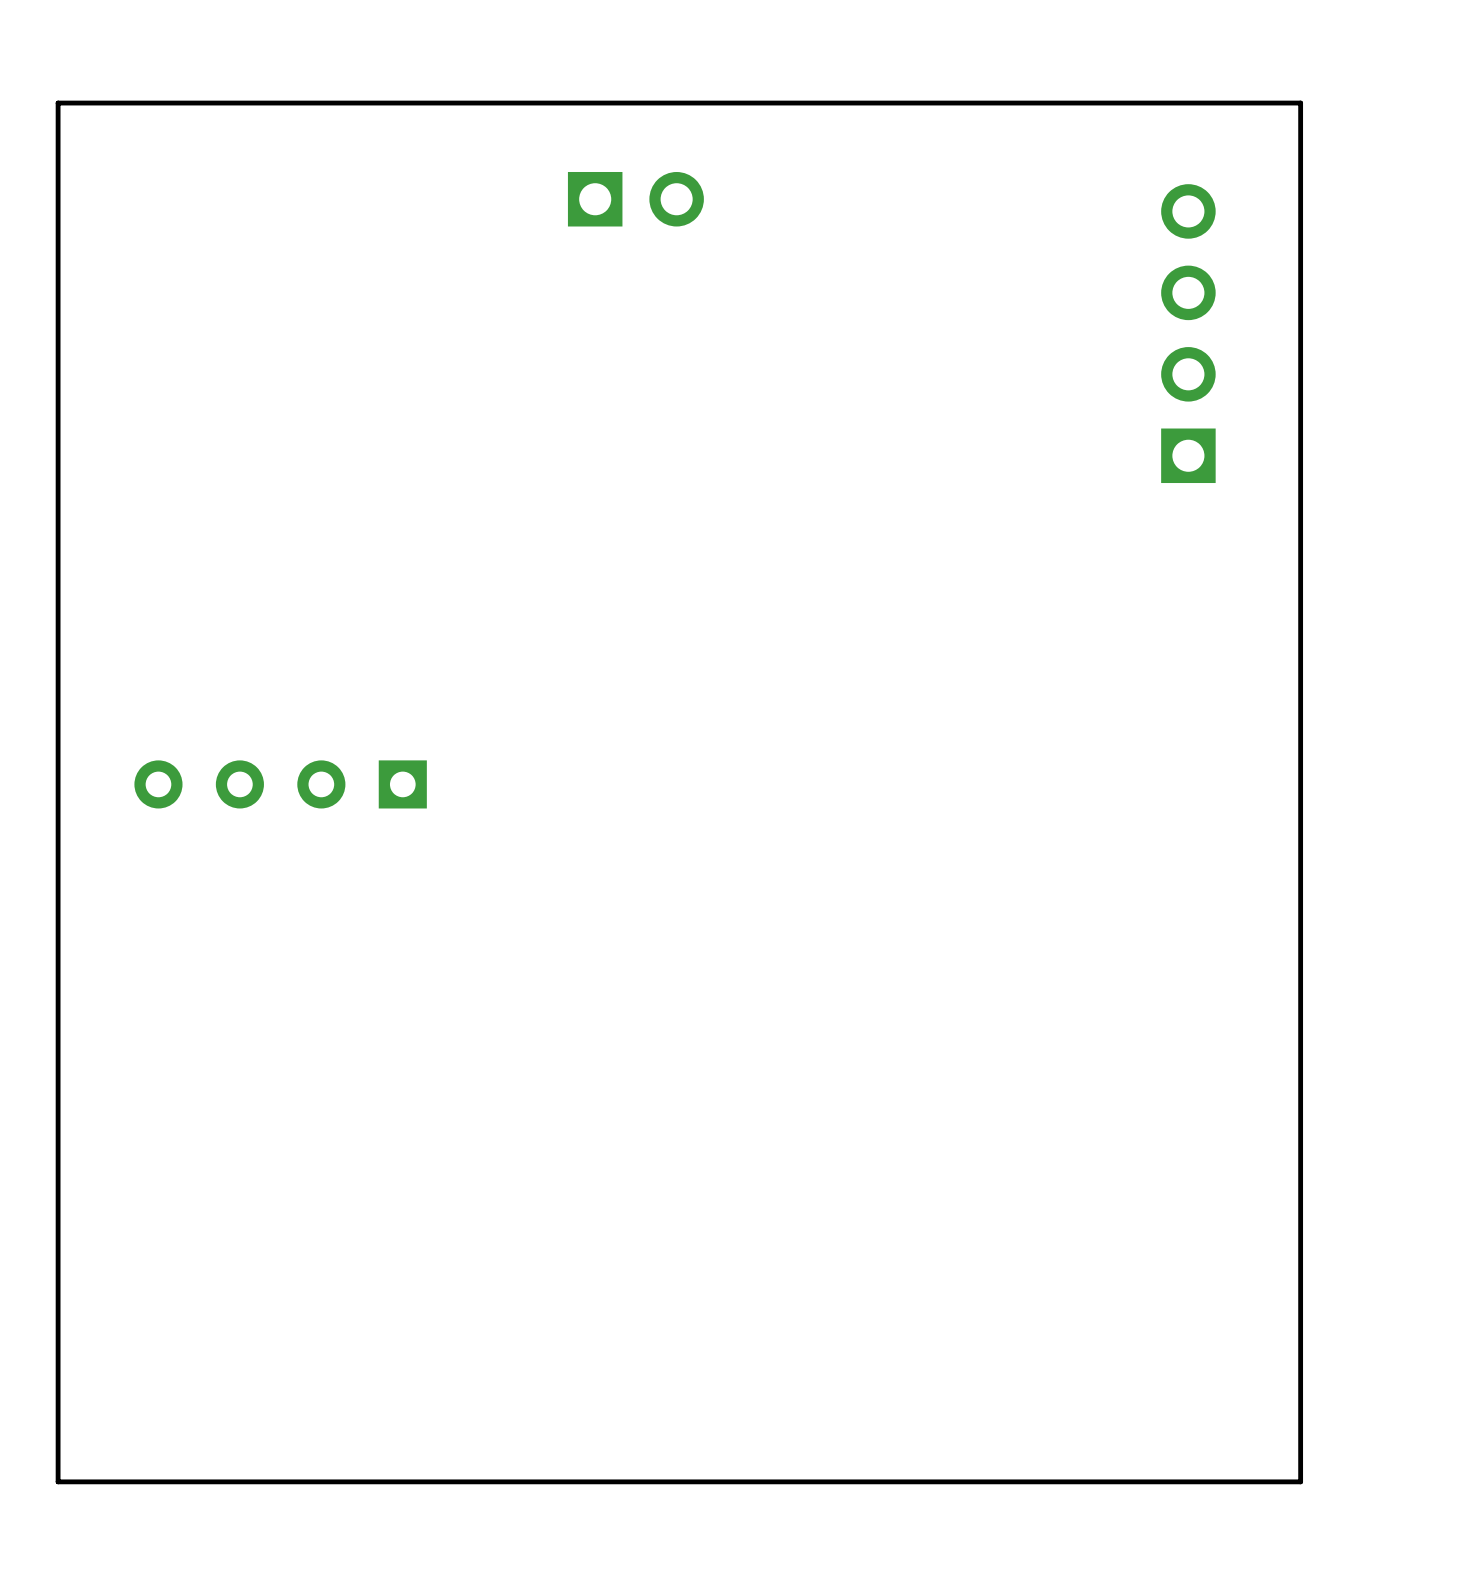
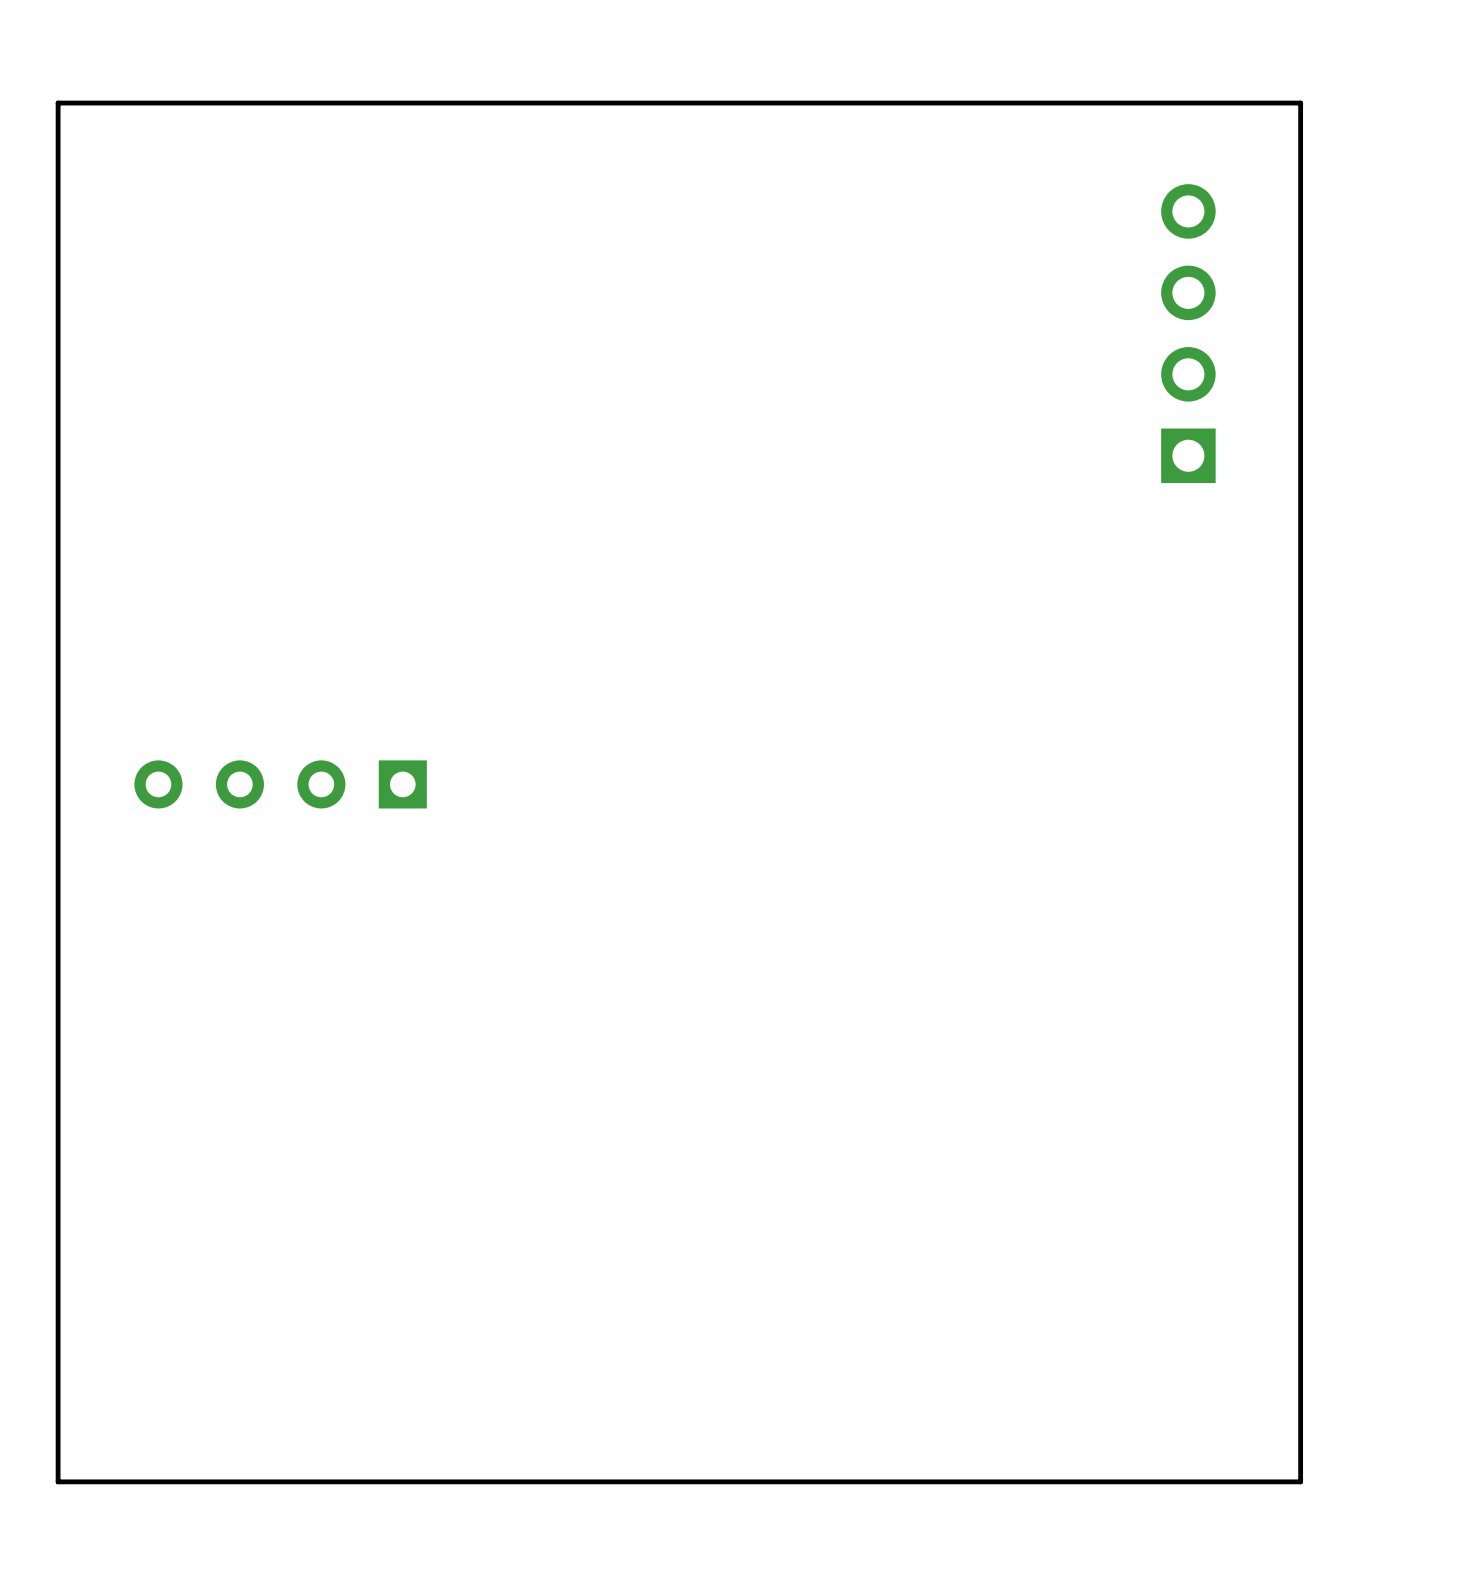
part: (635, 199) -> none

